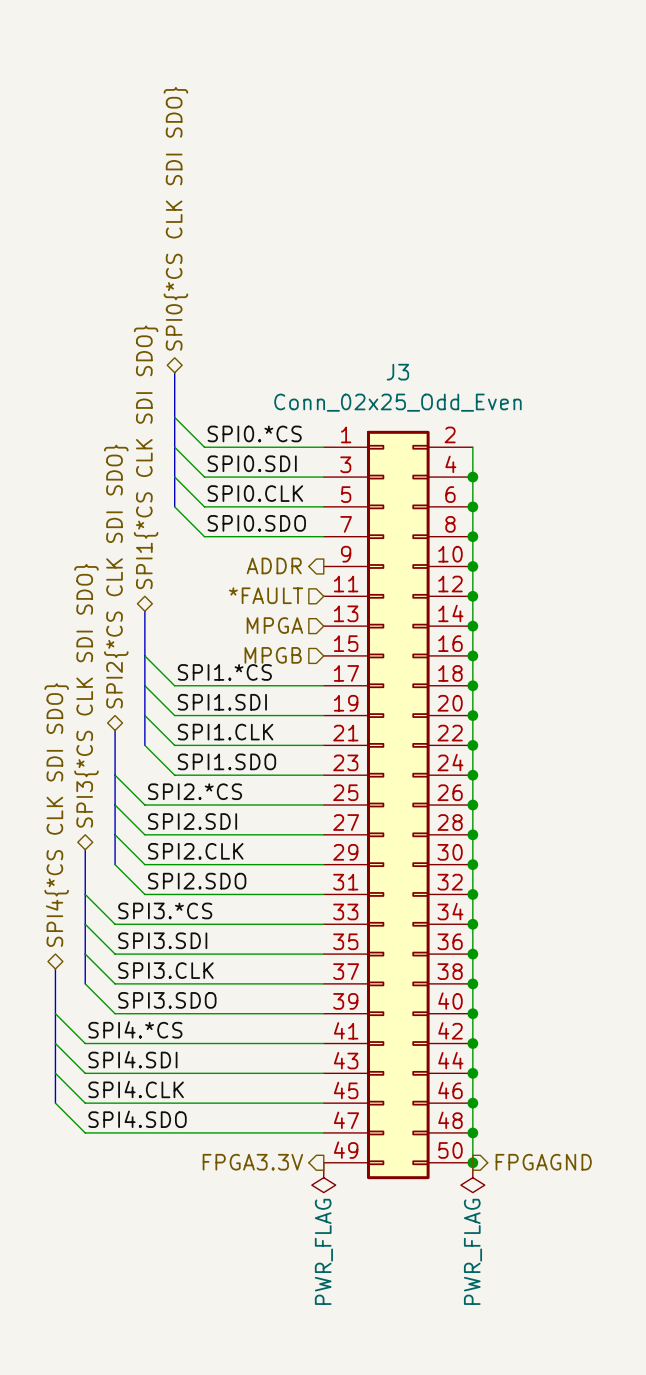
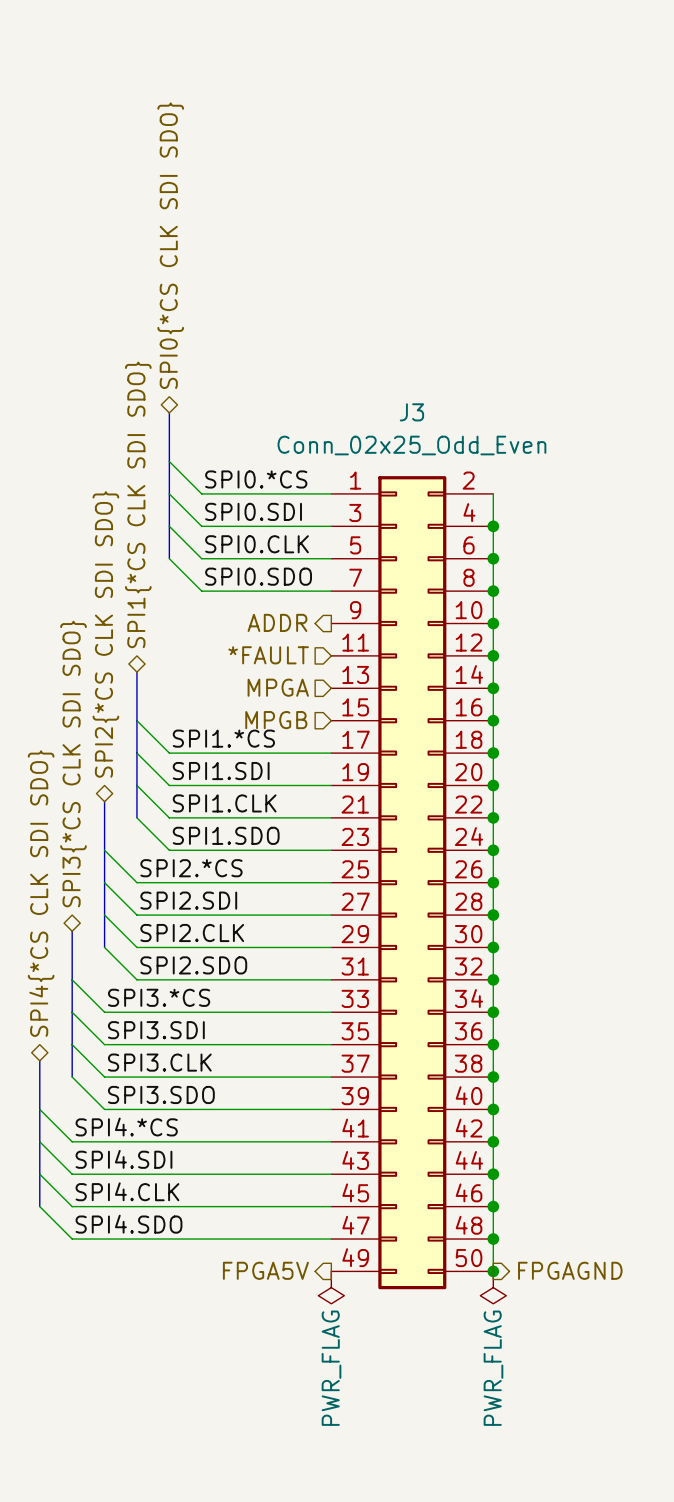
hierarchical label: FPGA3.3V (252, 1162) -> FPGA5V (265, 1270)

